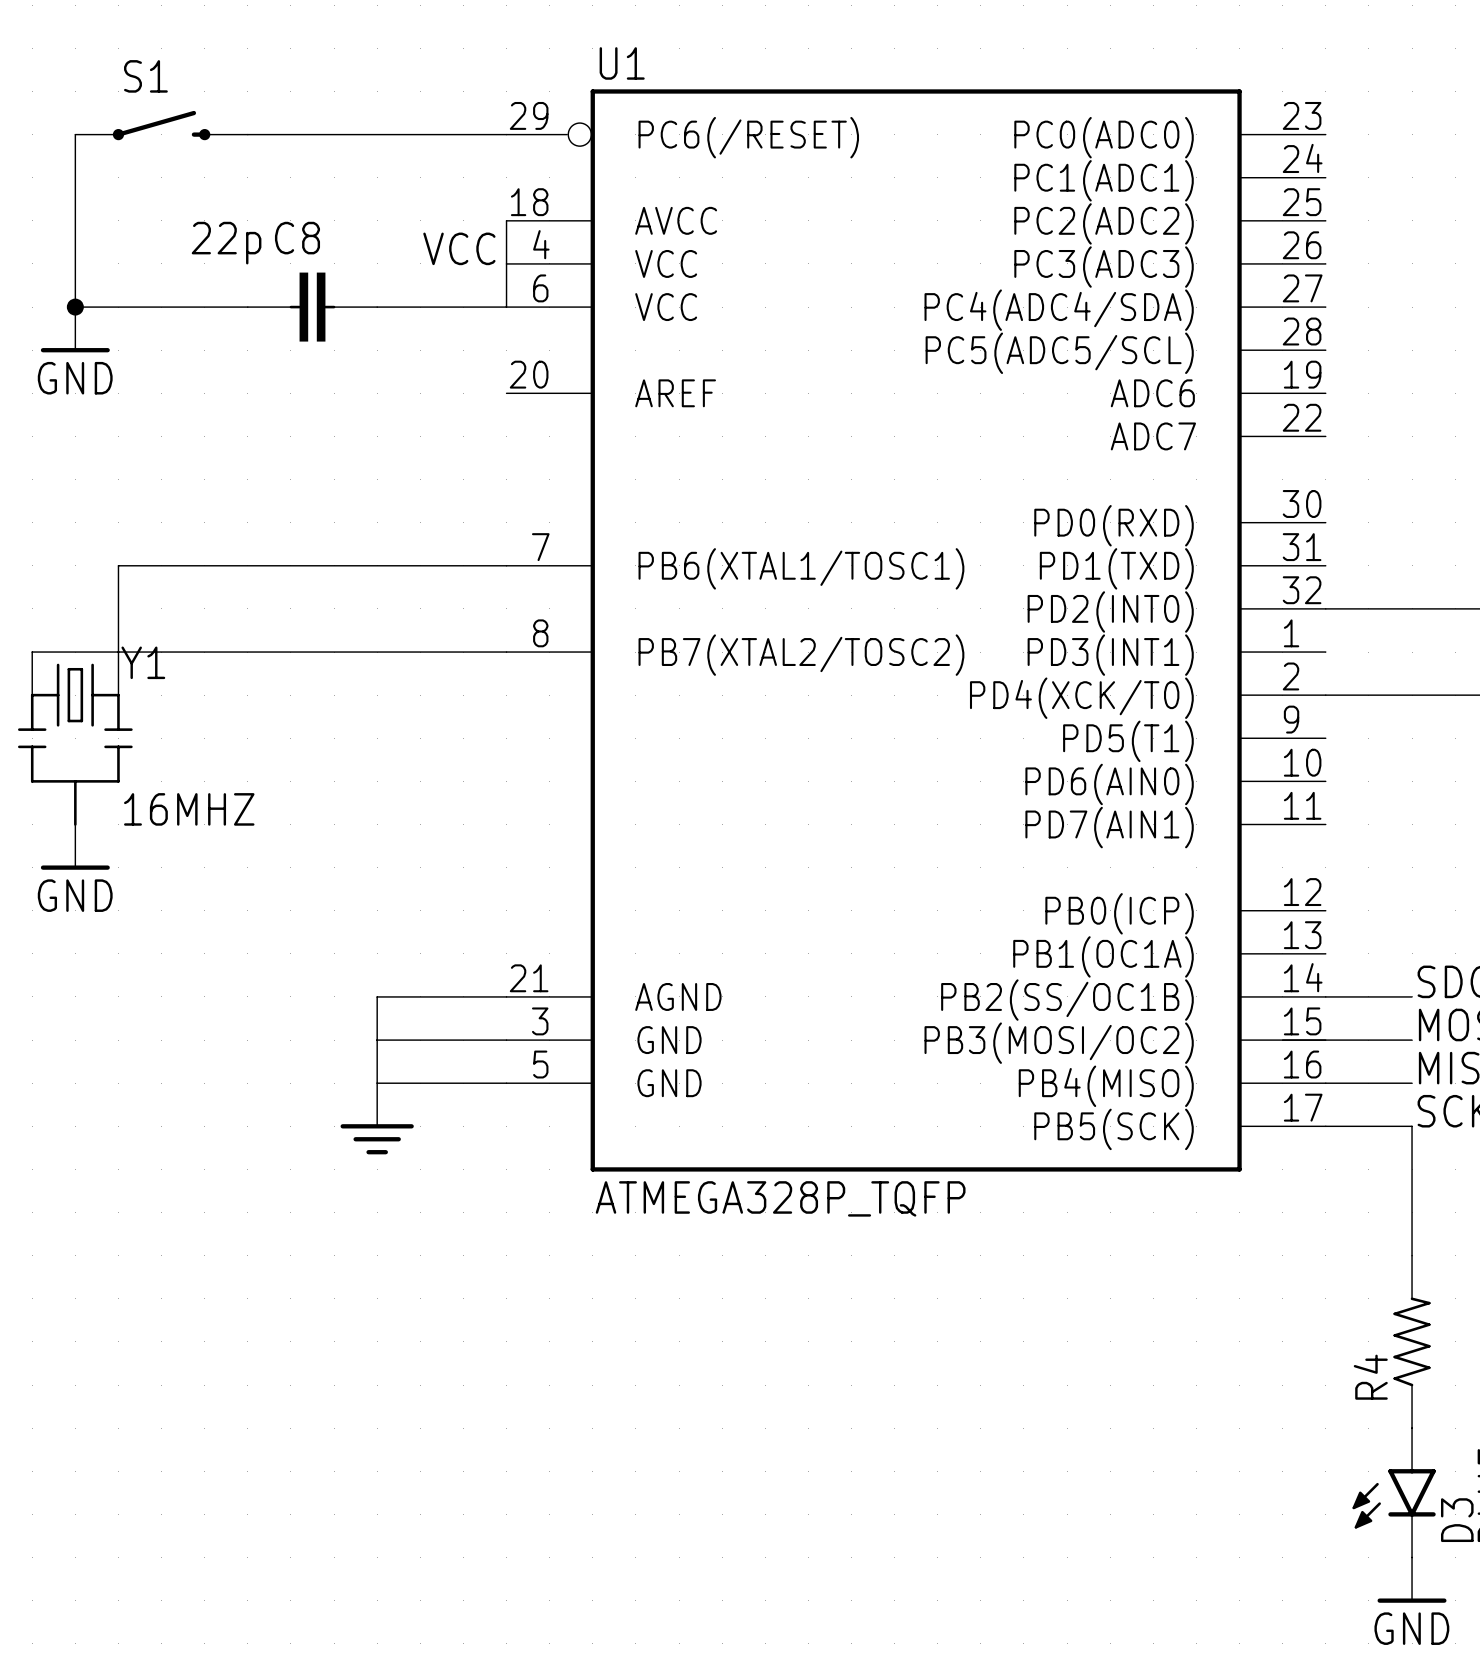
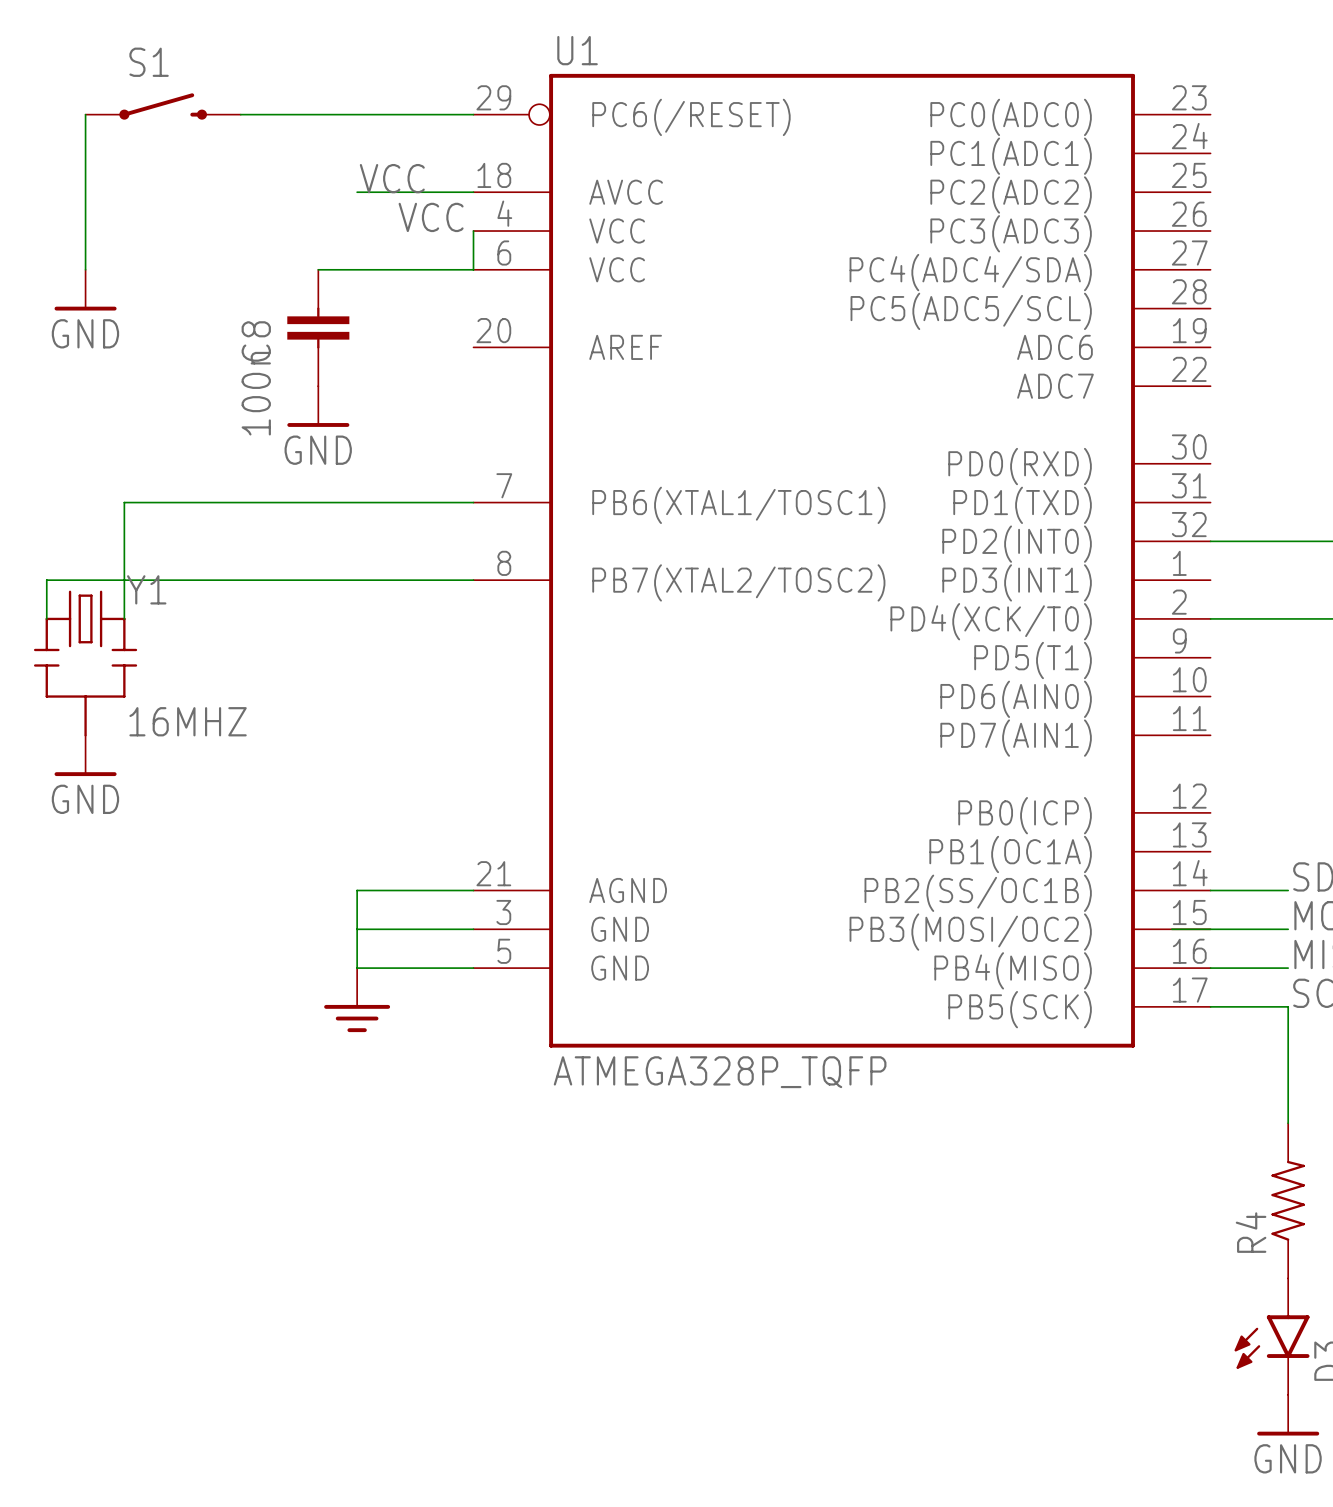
label: none -> VCC (392, 178)
wire: (506, 220) (506, 263) -> (473, 192) (357, 192)
C8 name position: C8 (297, 238) -> C8 (256, 341)
C8 value: 22p (226, 243) -> 100n (256, 393)
wire: (75, 307) (247, 307) -> none
junction: (75, 307) -> none
C8 rotation: 0° (312, 307) -> 90° clockwise (318, 327)
power symbol: none -> GND (318, 406)

